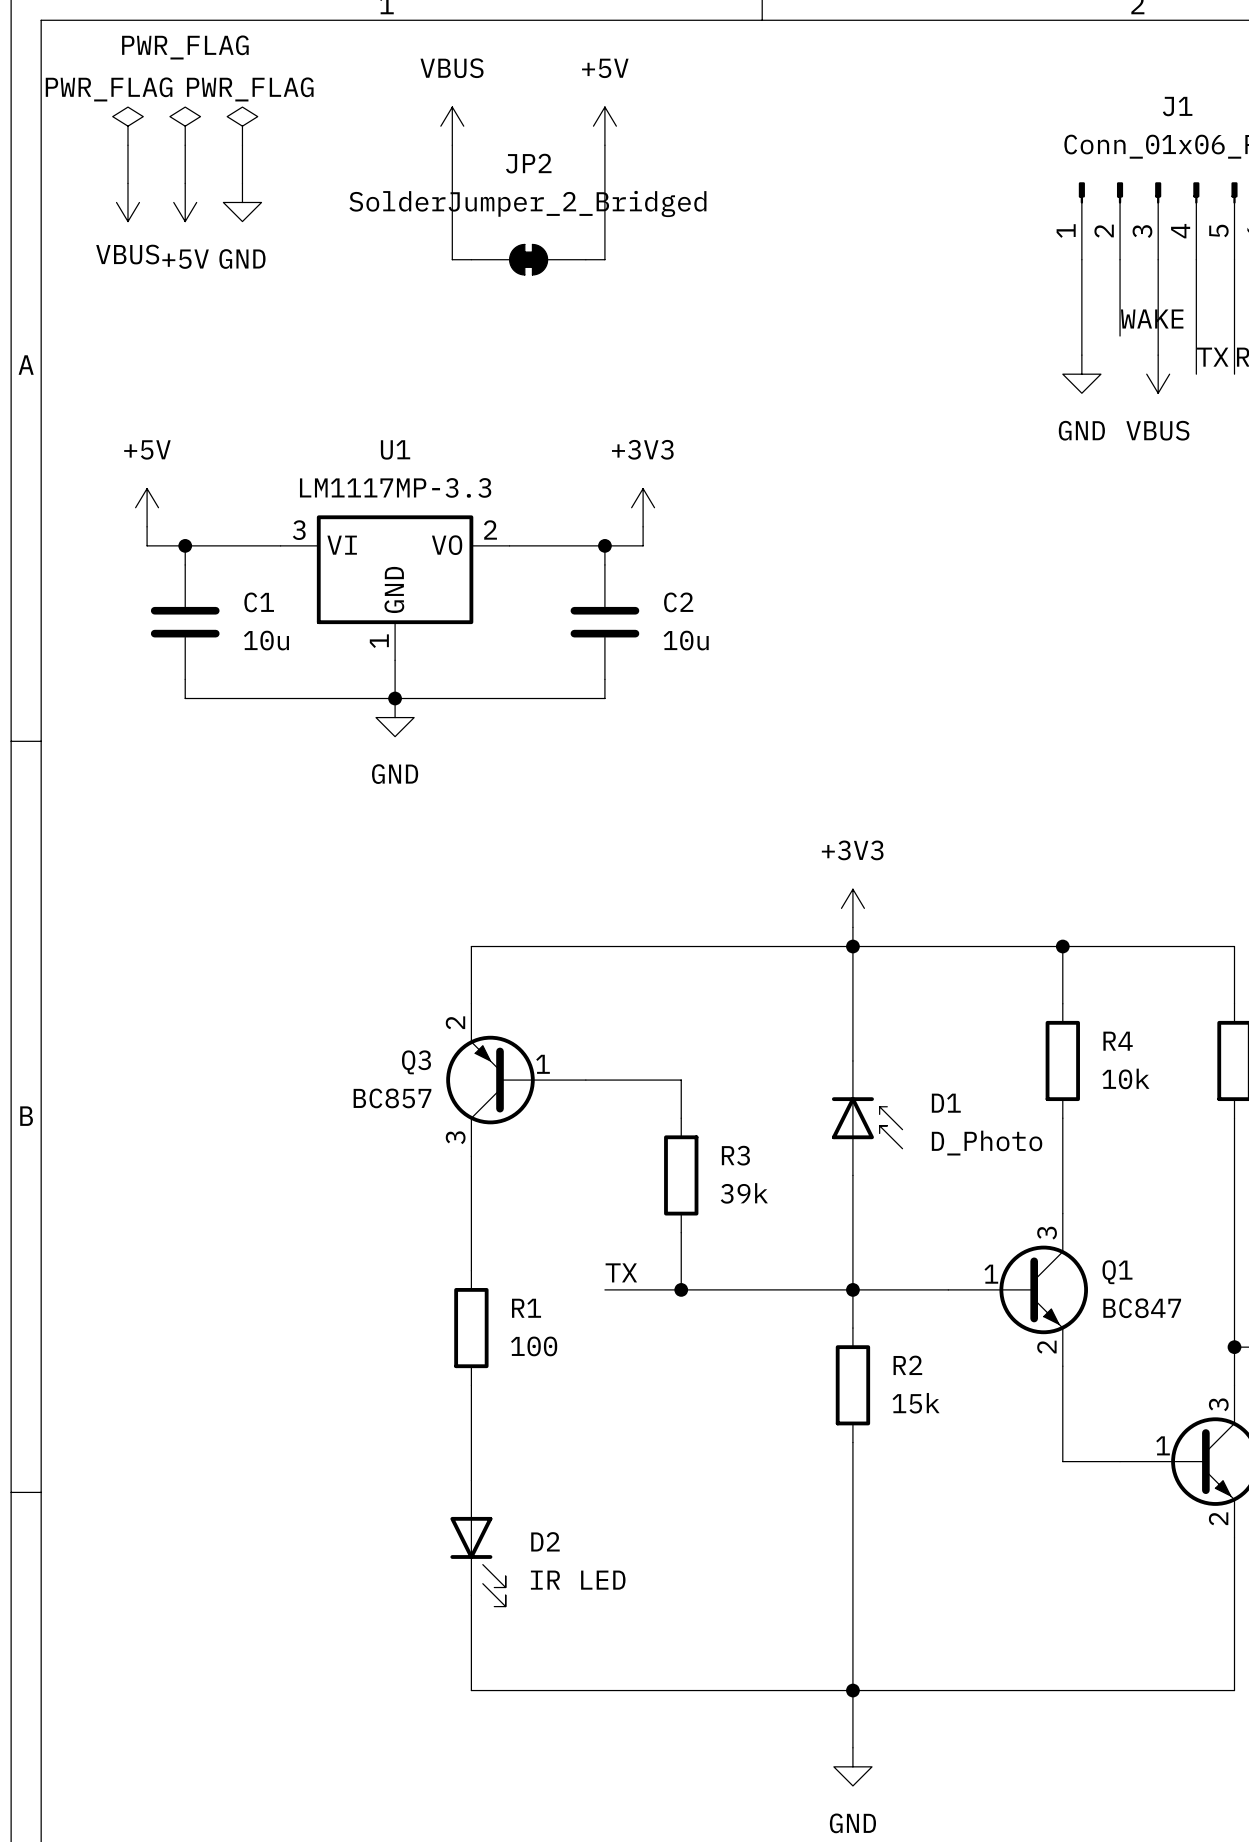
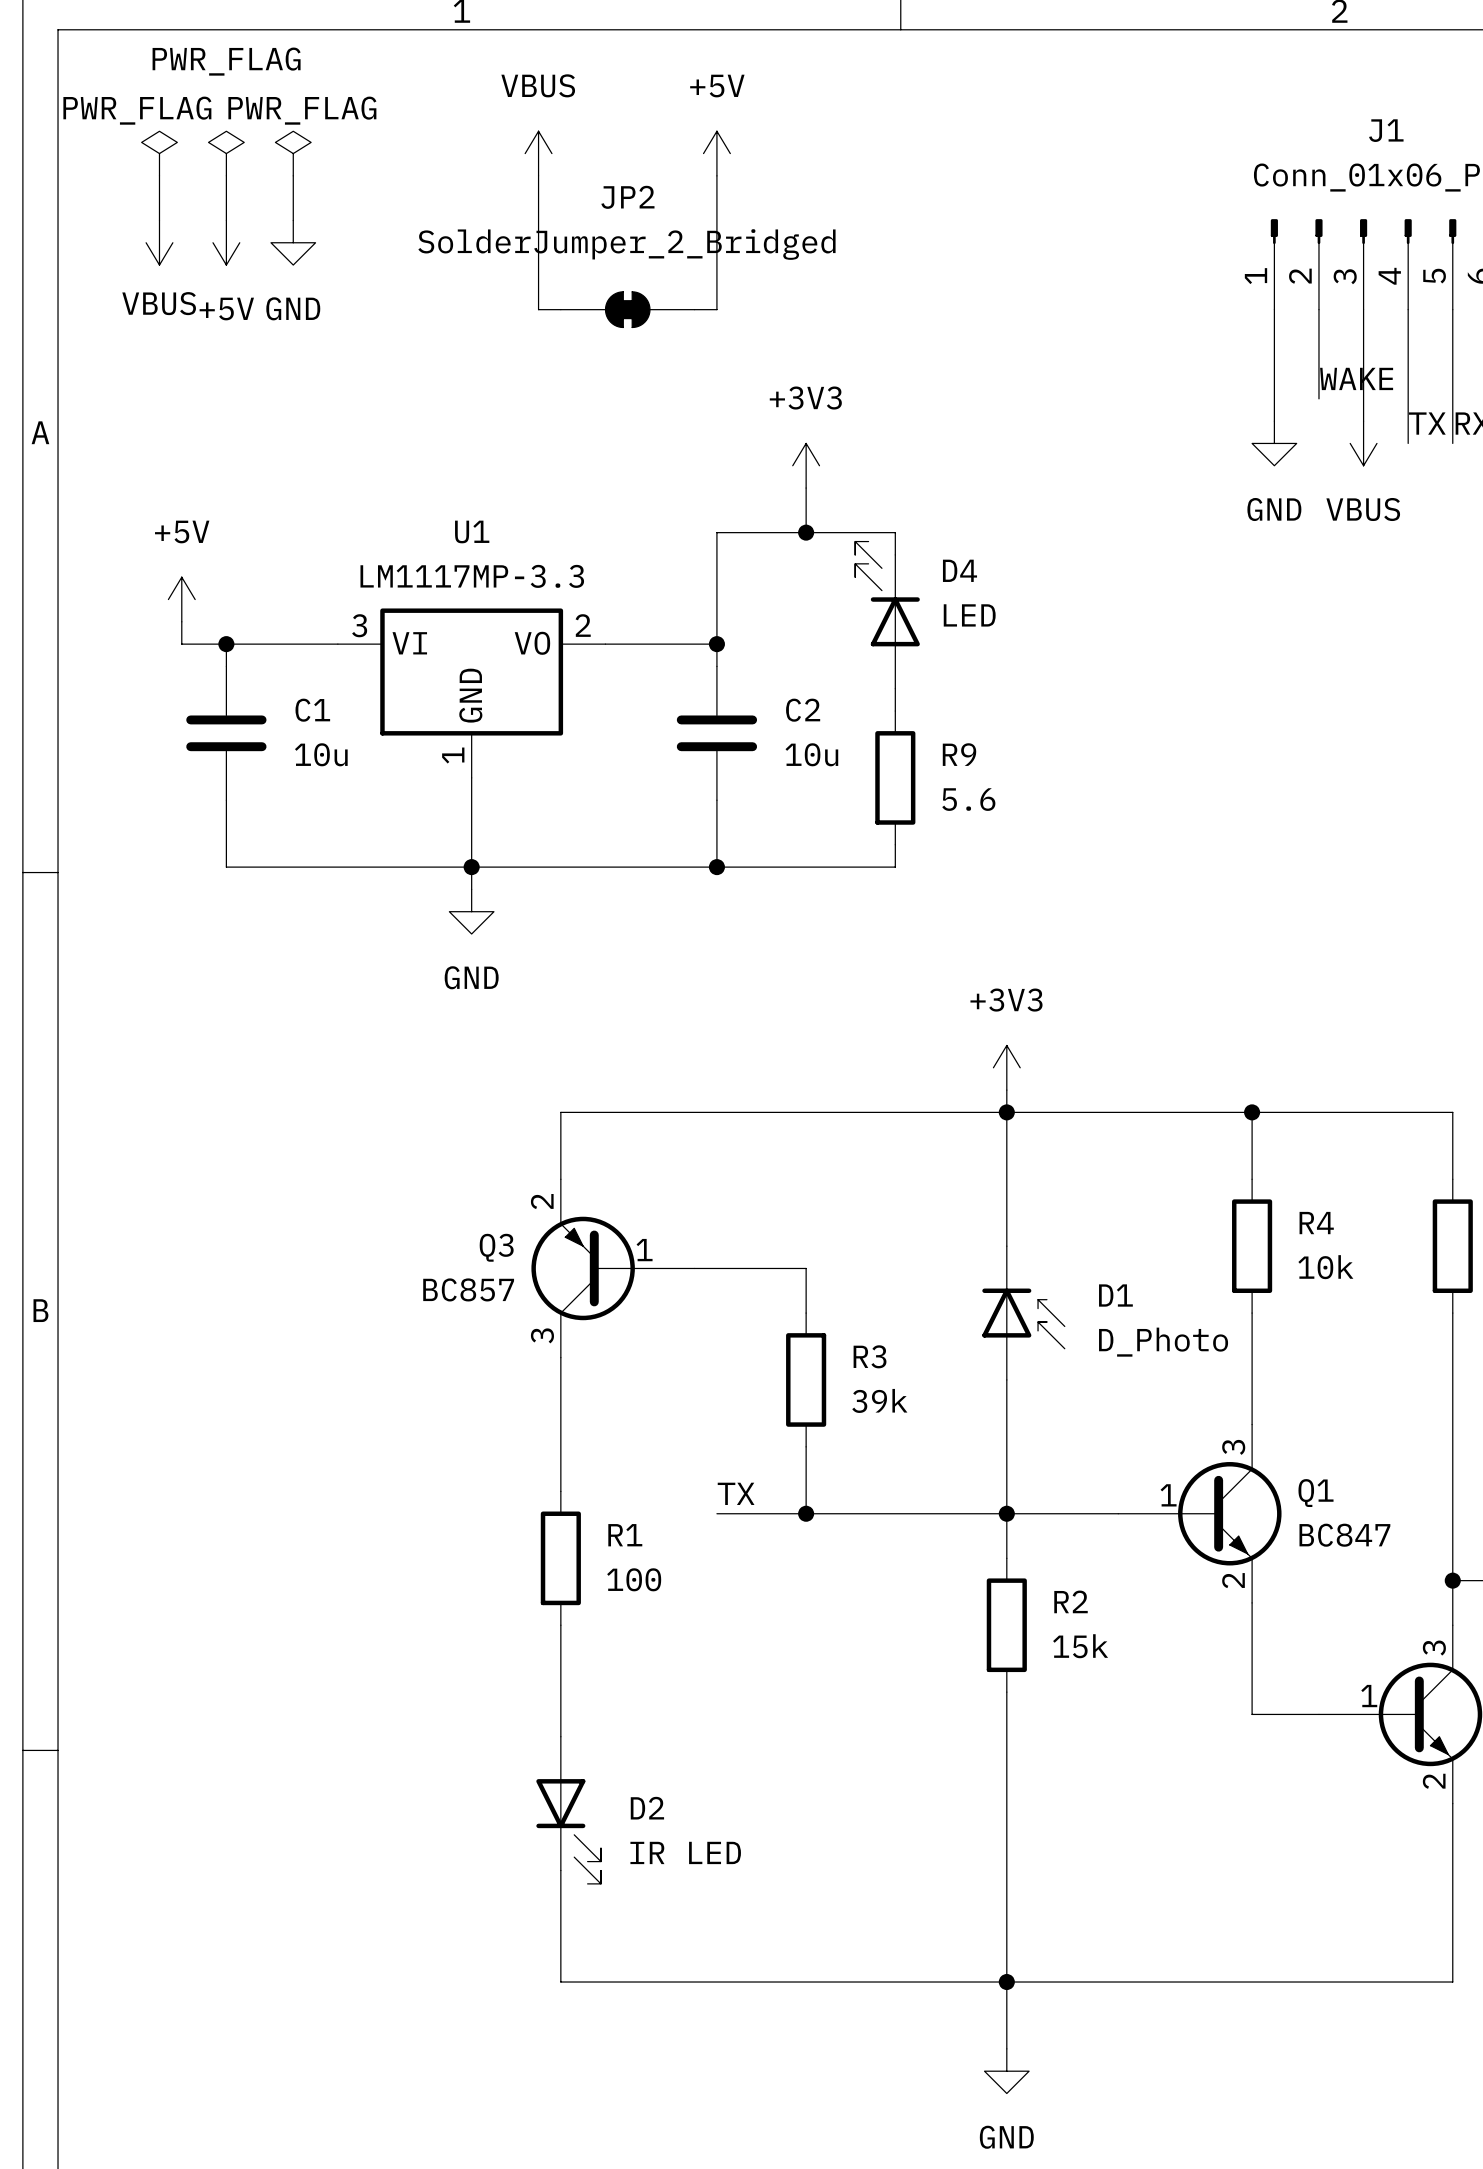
wire: none -> (806, 488) (806, 532)
junction: none -> (806, 532)
power symbol position: +3V3 (643, 507) -> +3V3 (806, 465)
D4: none -> LED (887, 615)
wire: (643, 526) (643, 545) (604, 545) -> (895, 554) (895, 532) (716, 532) (716, 644)
wire: none -> (895, 688) (895, 711)
R9: none -> 5.6 (895, 777)
wire: (185, 698) (604, 698) -> (226, 822) (226, 867) (895, 867) (895, 844)
wire: none -> (471, 822) (471, 889)
junction position: (395, 698) -> (471, 867)
wire: none -> (716, 822) (716, 867)
power symbol position: GND (395, 717) -> GND (471, 911)
junction: none -> (716, 867)

